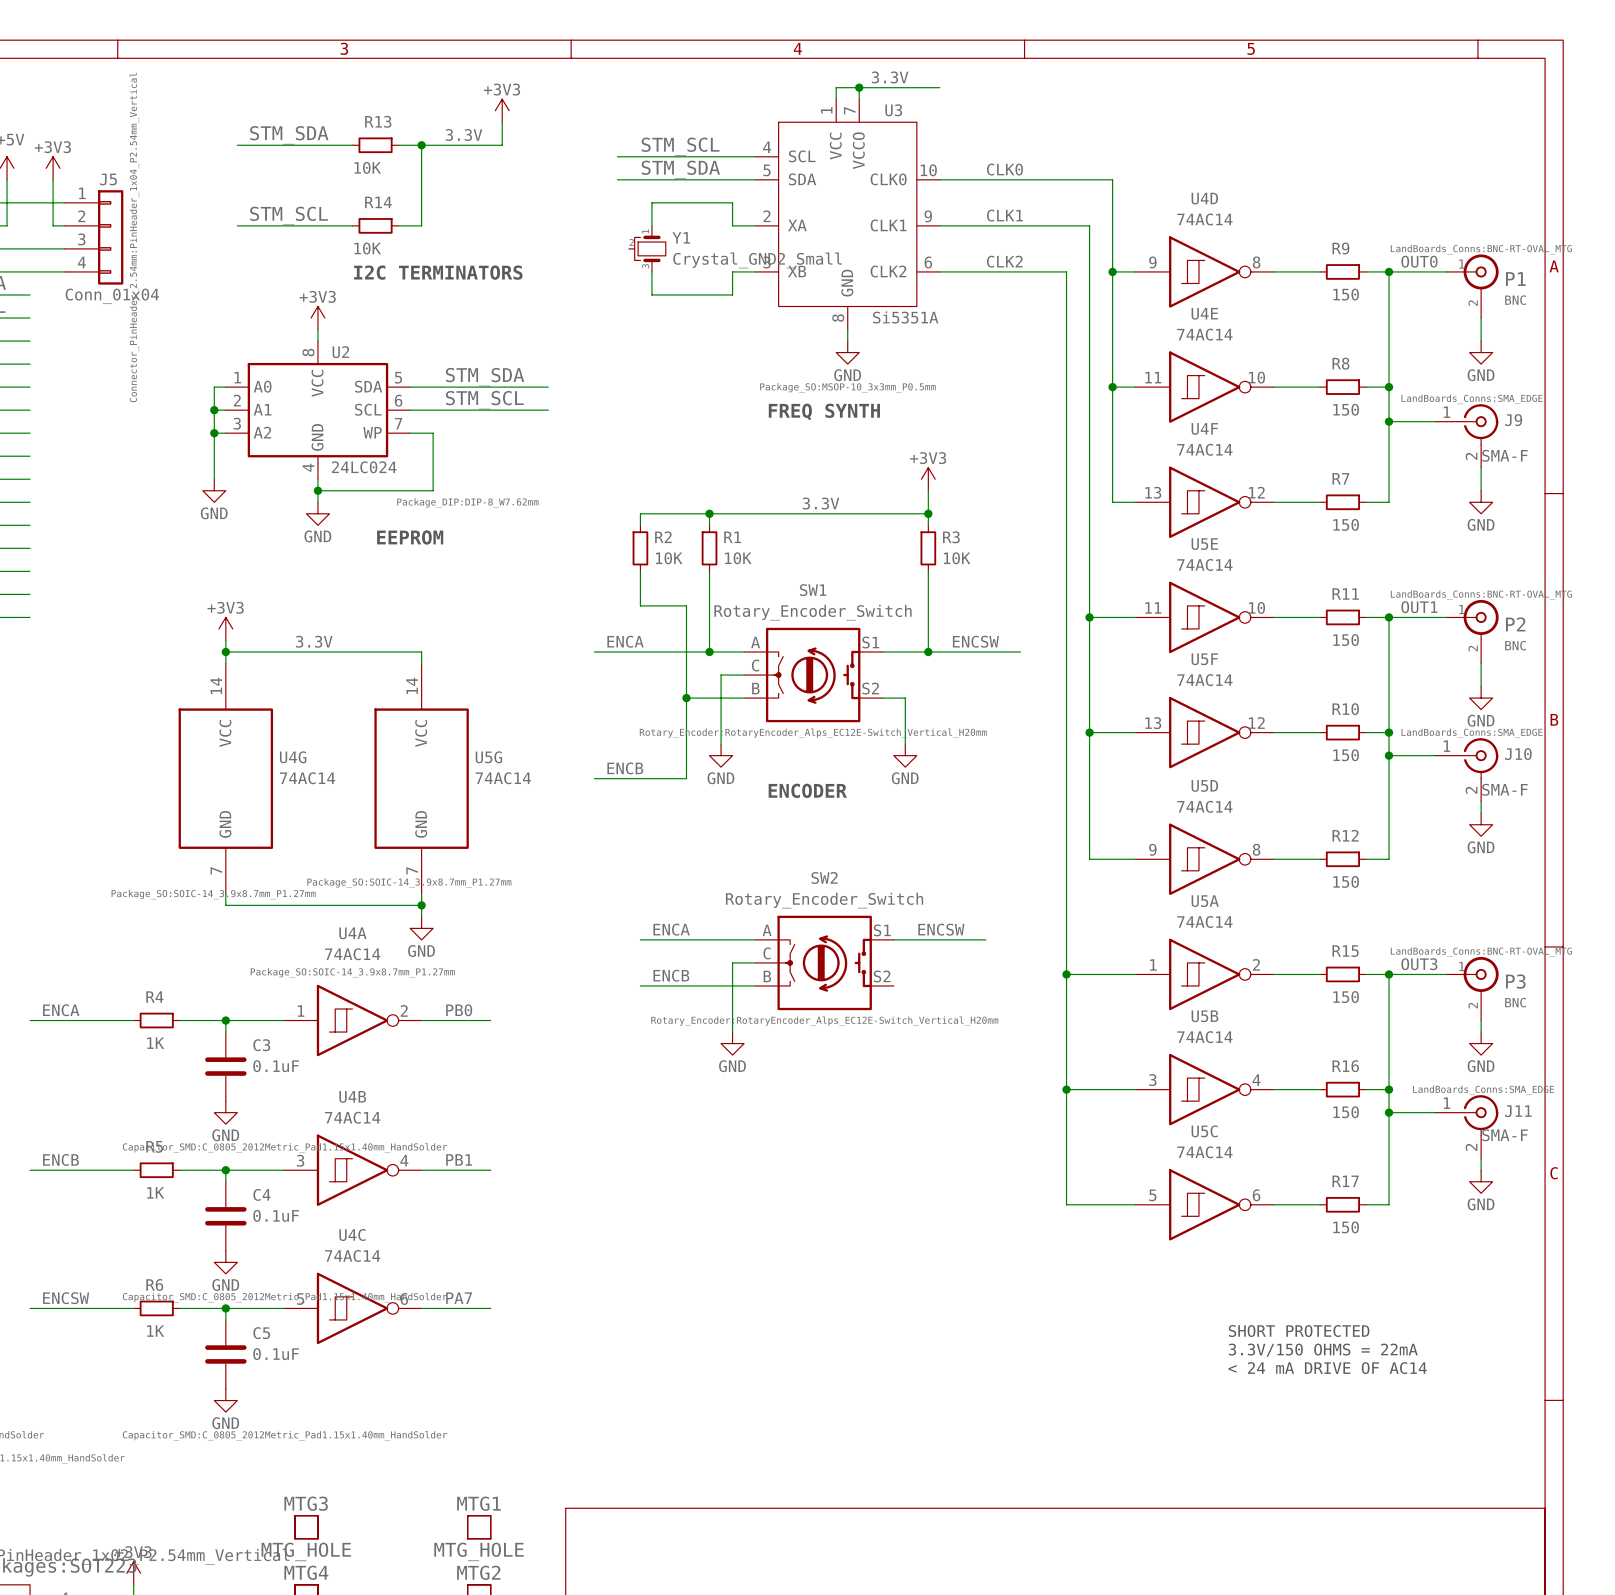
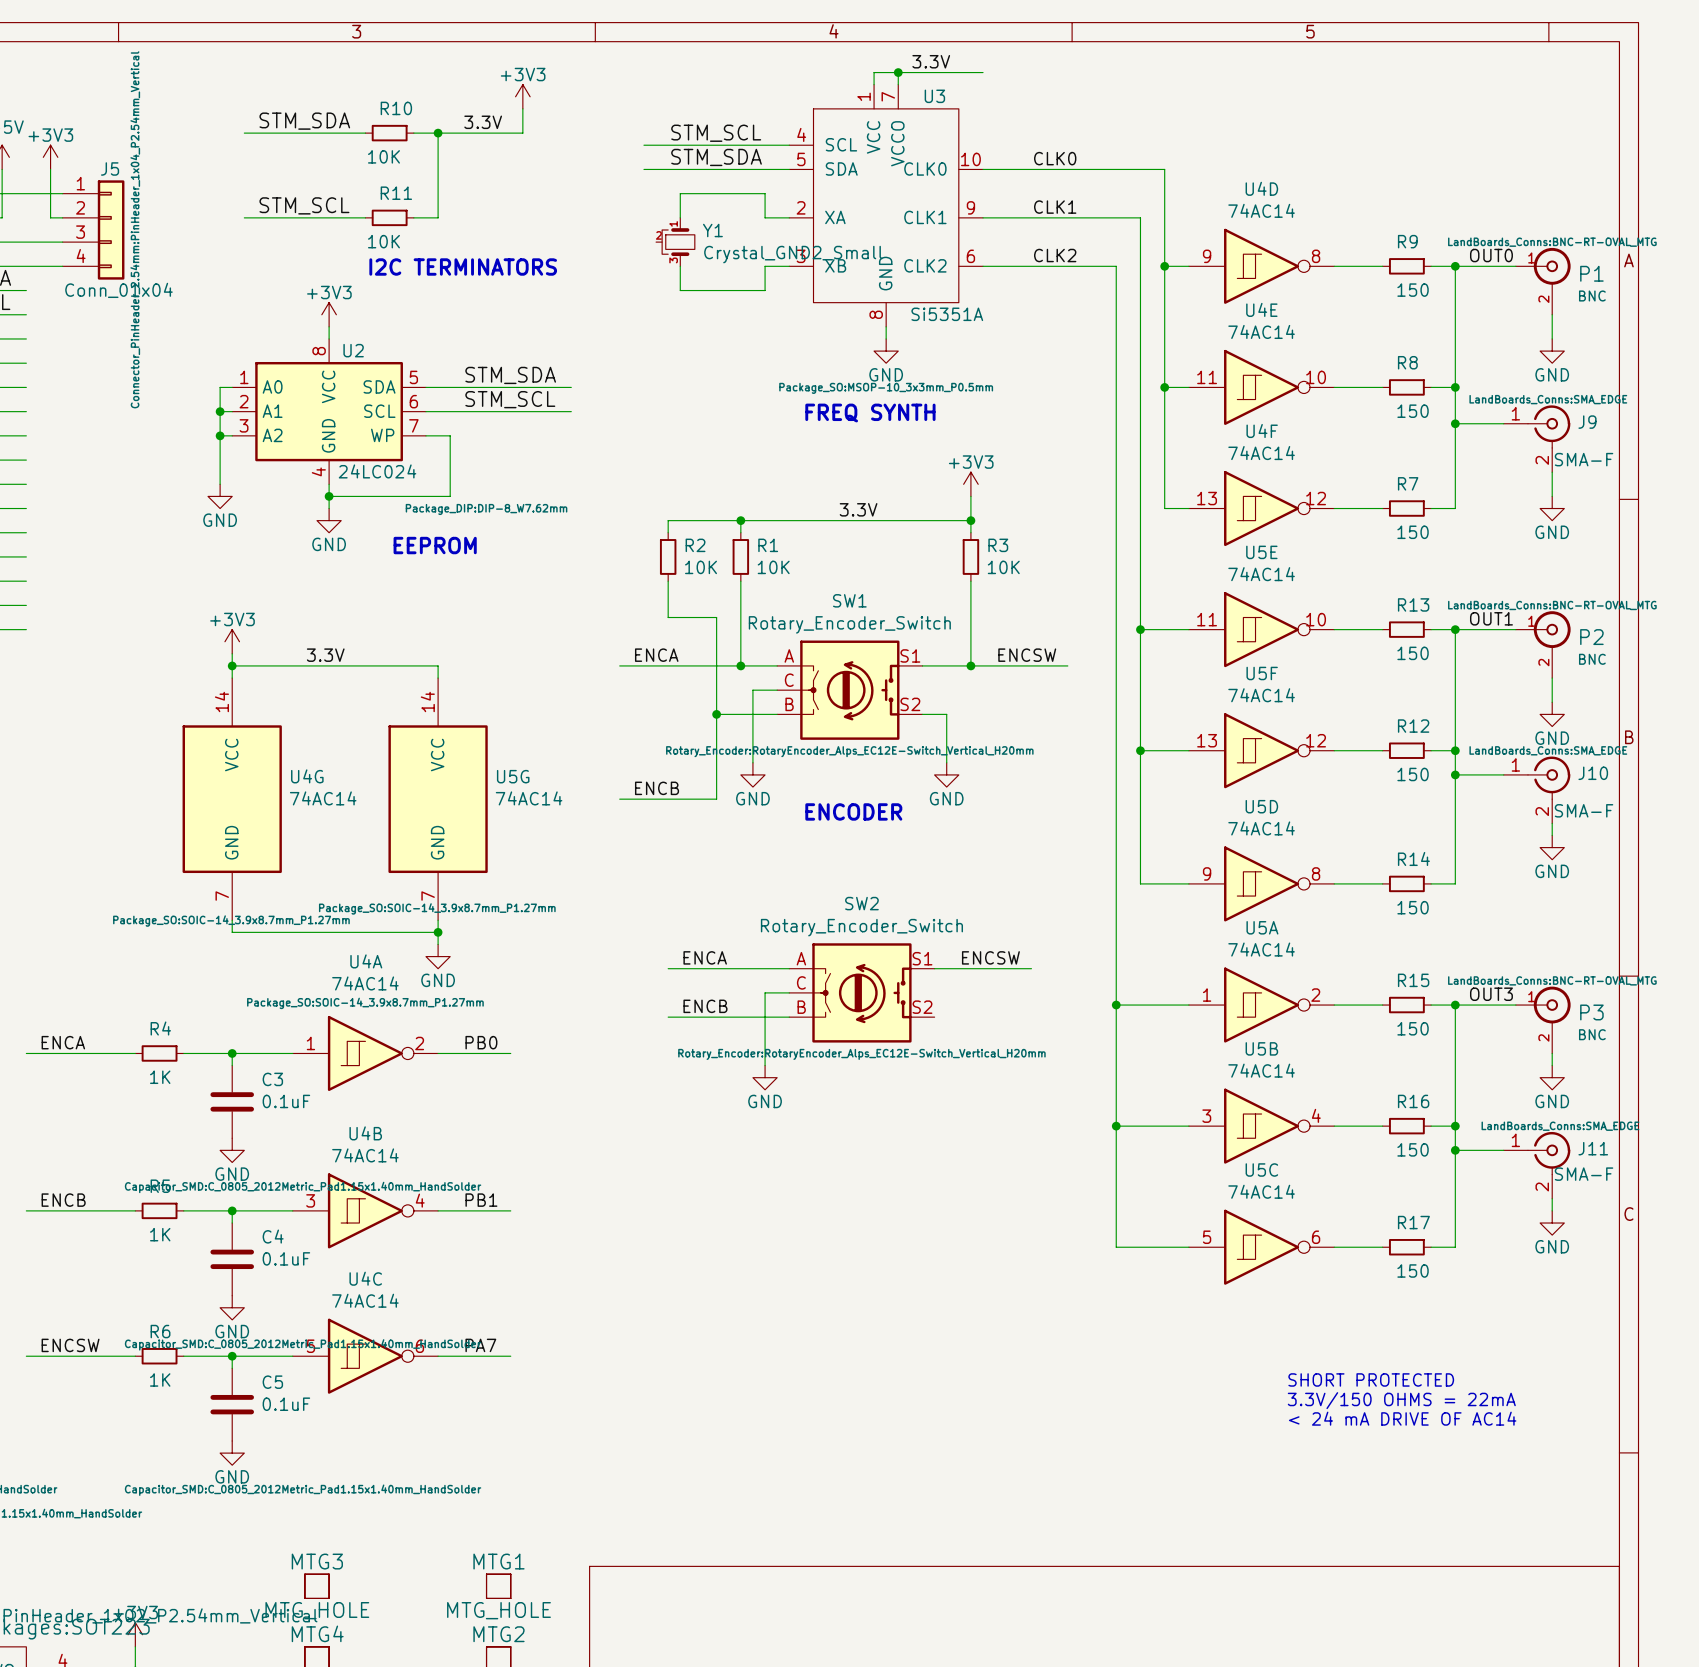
R13 name: R13 (378, 121) -> R10 (396, 108)
R14 name: R14 (378, 202) -> R11 (396, 193)
R11 name: R11 (1345, 593) -> R13 (1413, 604)
R10 name: R10 (1345, 709) -> R12 (1413, 726)
R12 name: R12 (1345, 835) -> R14 (1413, 858)

